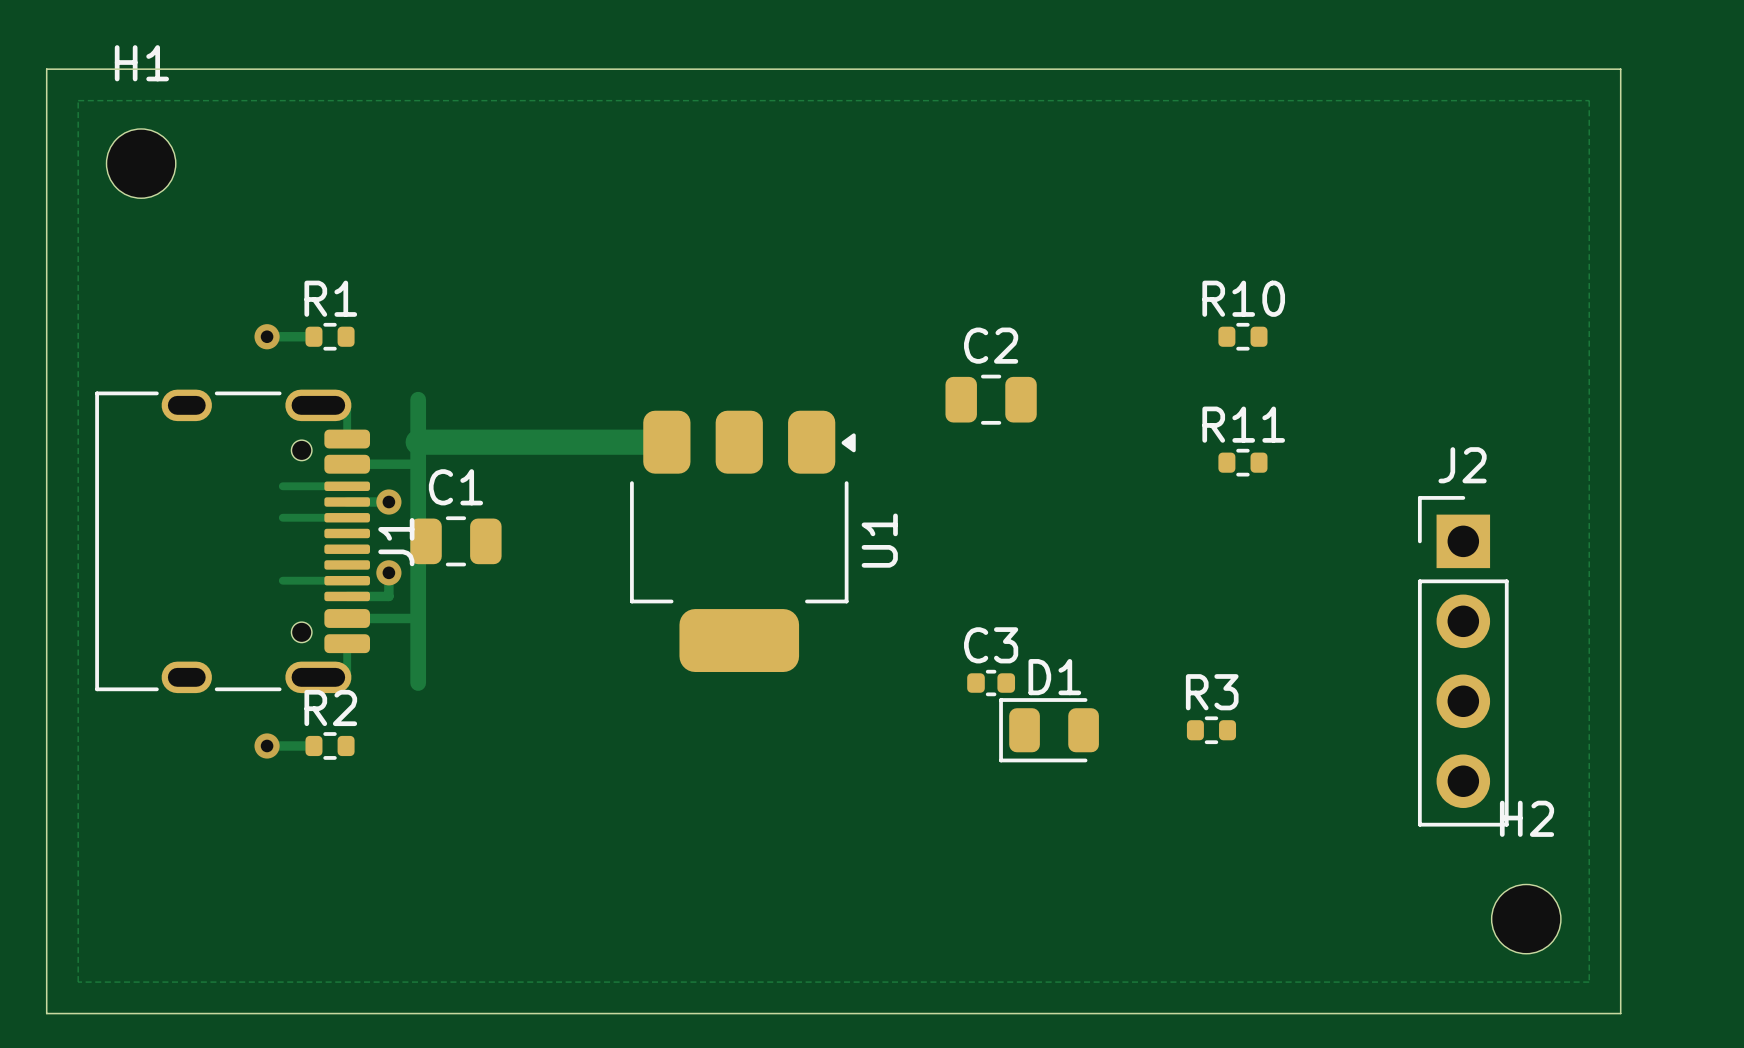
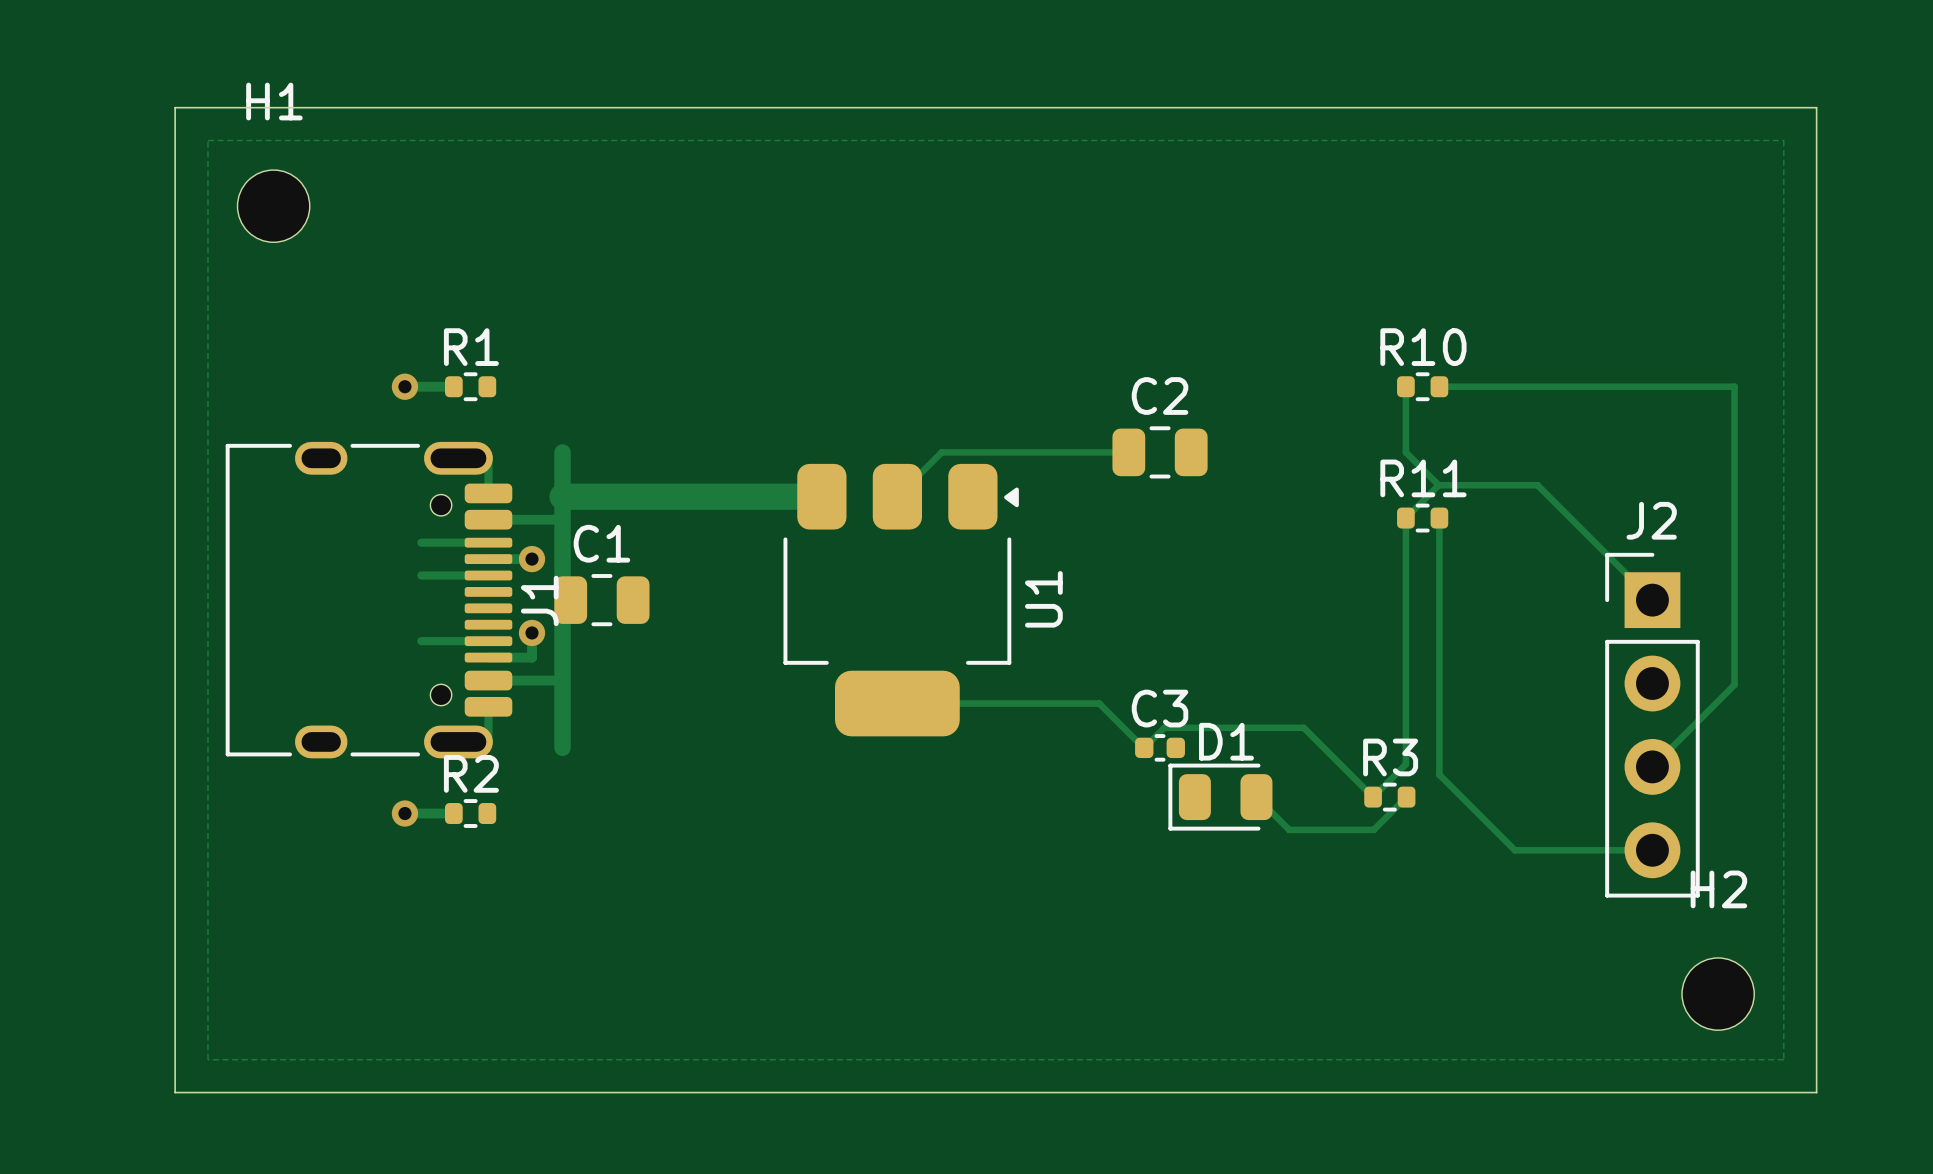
track: none -> (1405, 386) (1405, 452) (1438, 485)
track: none -> (1439, 386) (1734, 386) (1734, 684) (1652, 766)
track: none -> (1128, 452) (941, 452) (897, 496)
track: none -> (1438, 485) (1405, 518) (1405, 764) (1373, 797) (1303, 727) (1164, 727) (1144, 747)
track: none -> (1438, 485) (1537, 485) (1652, 600)
track: none -> (1439, 518) (1439, 774) (1514, 850) (1652, 850)
track: none -> (897, 703) (1099, 703) (1143, 747)
track: none -> (1256, 797) (1289, 829) (1373, 829) (1406, 797)

